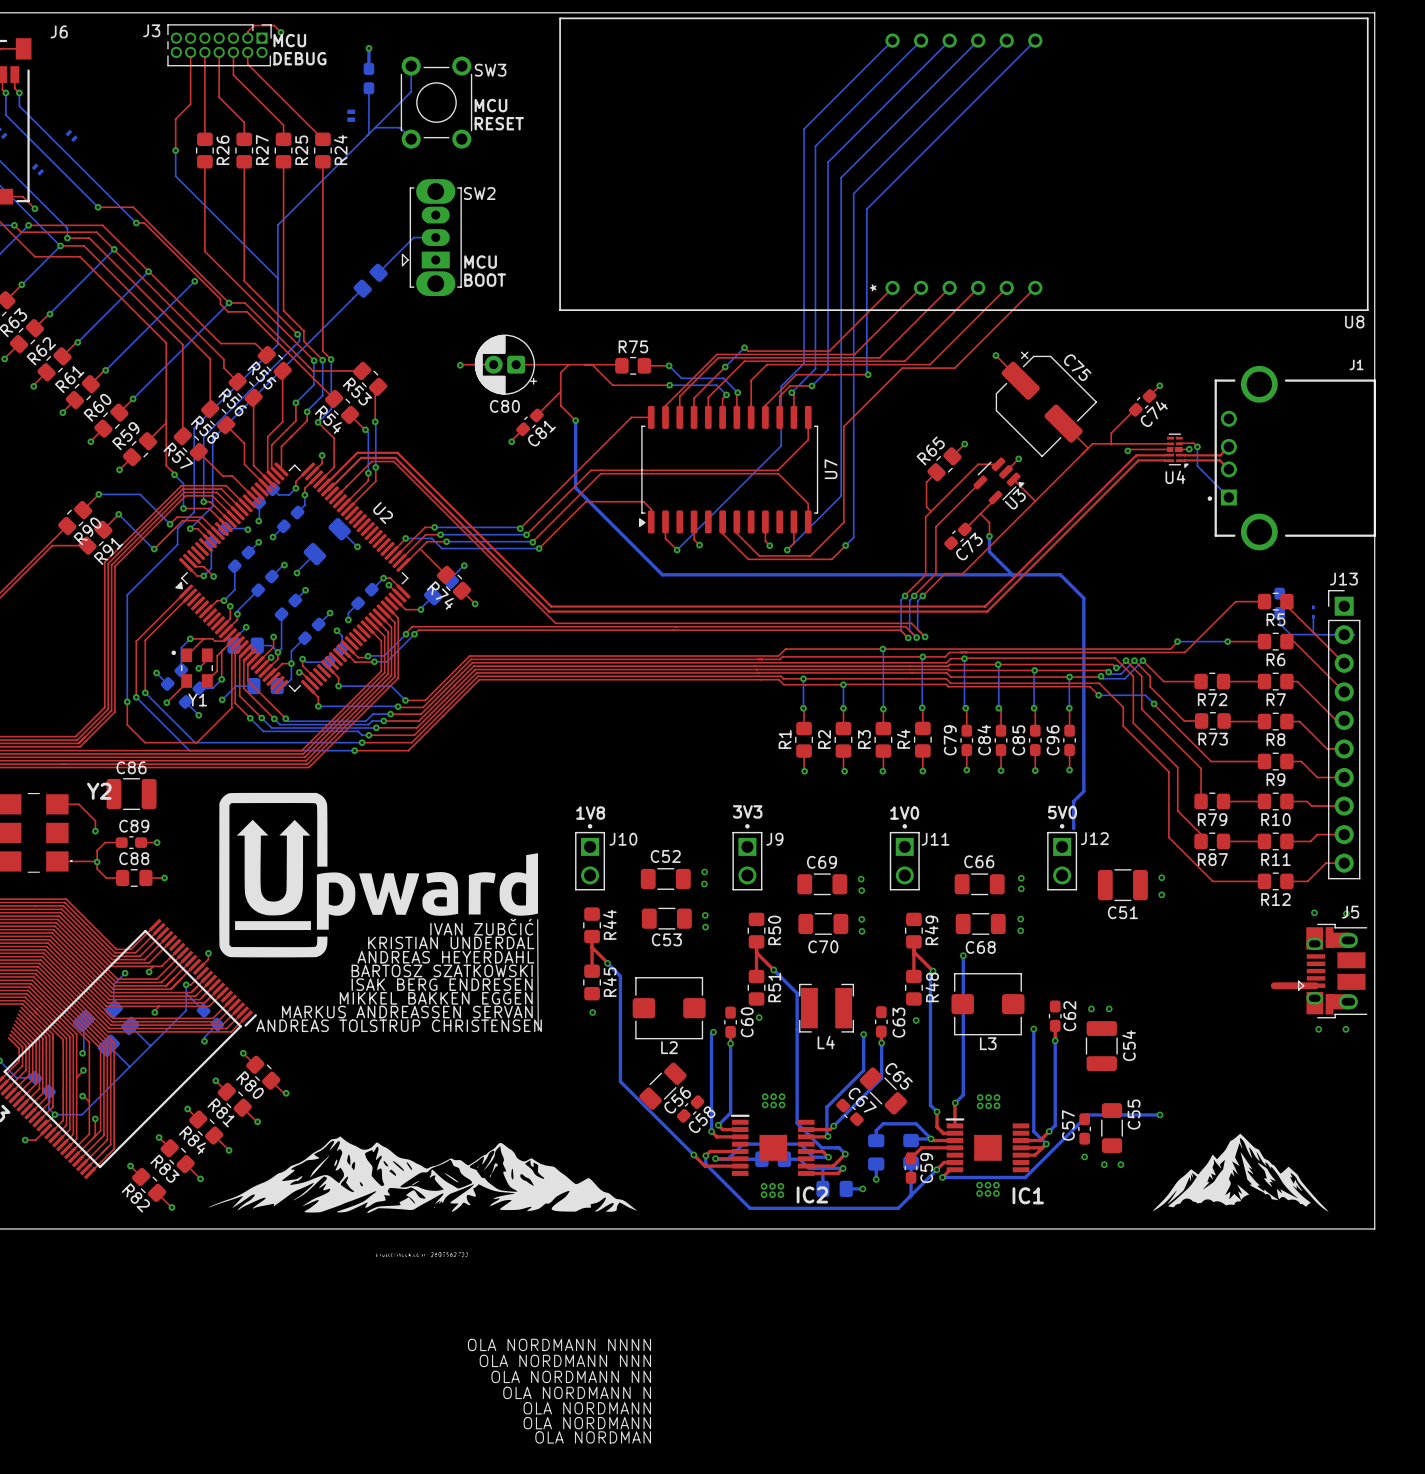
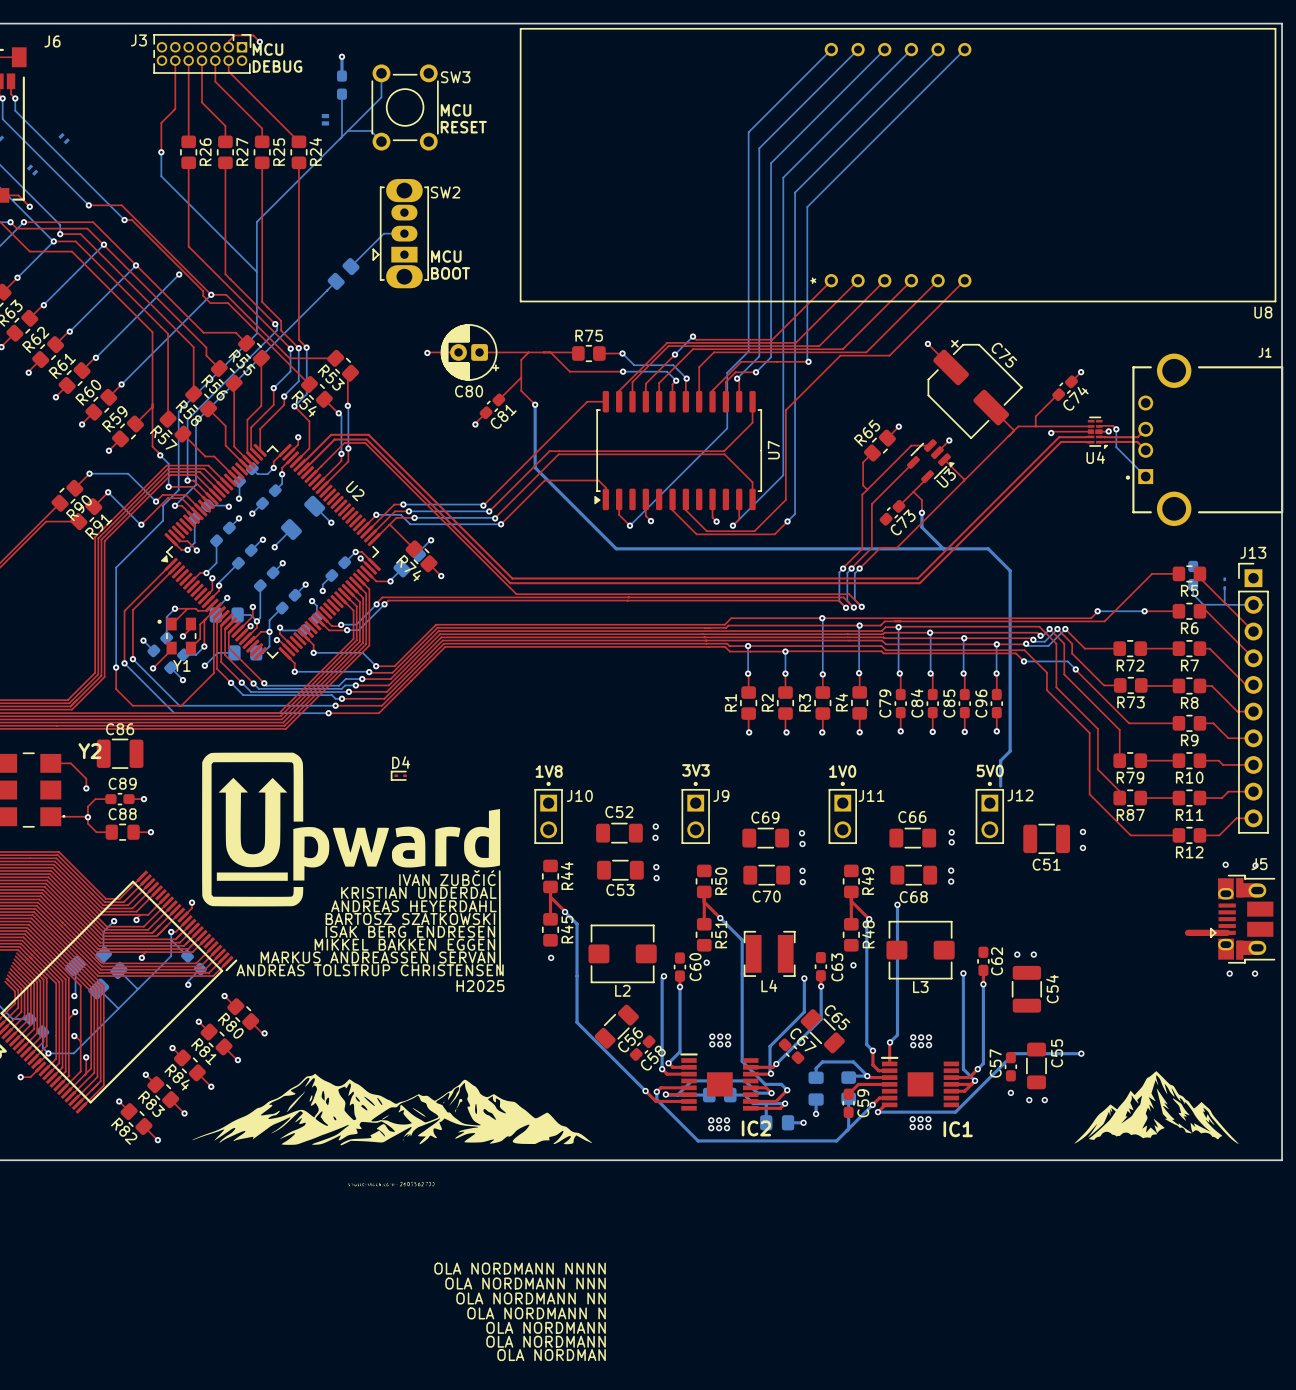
D4: none -> (398, 775)
text: none -> H2025 (480, 986)

